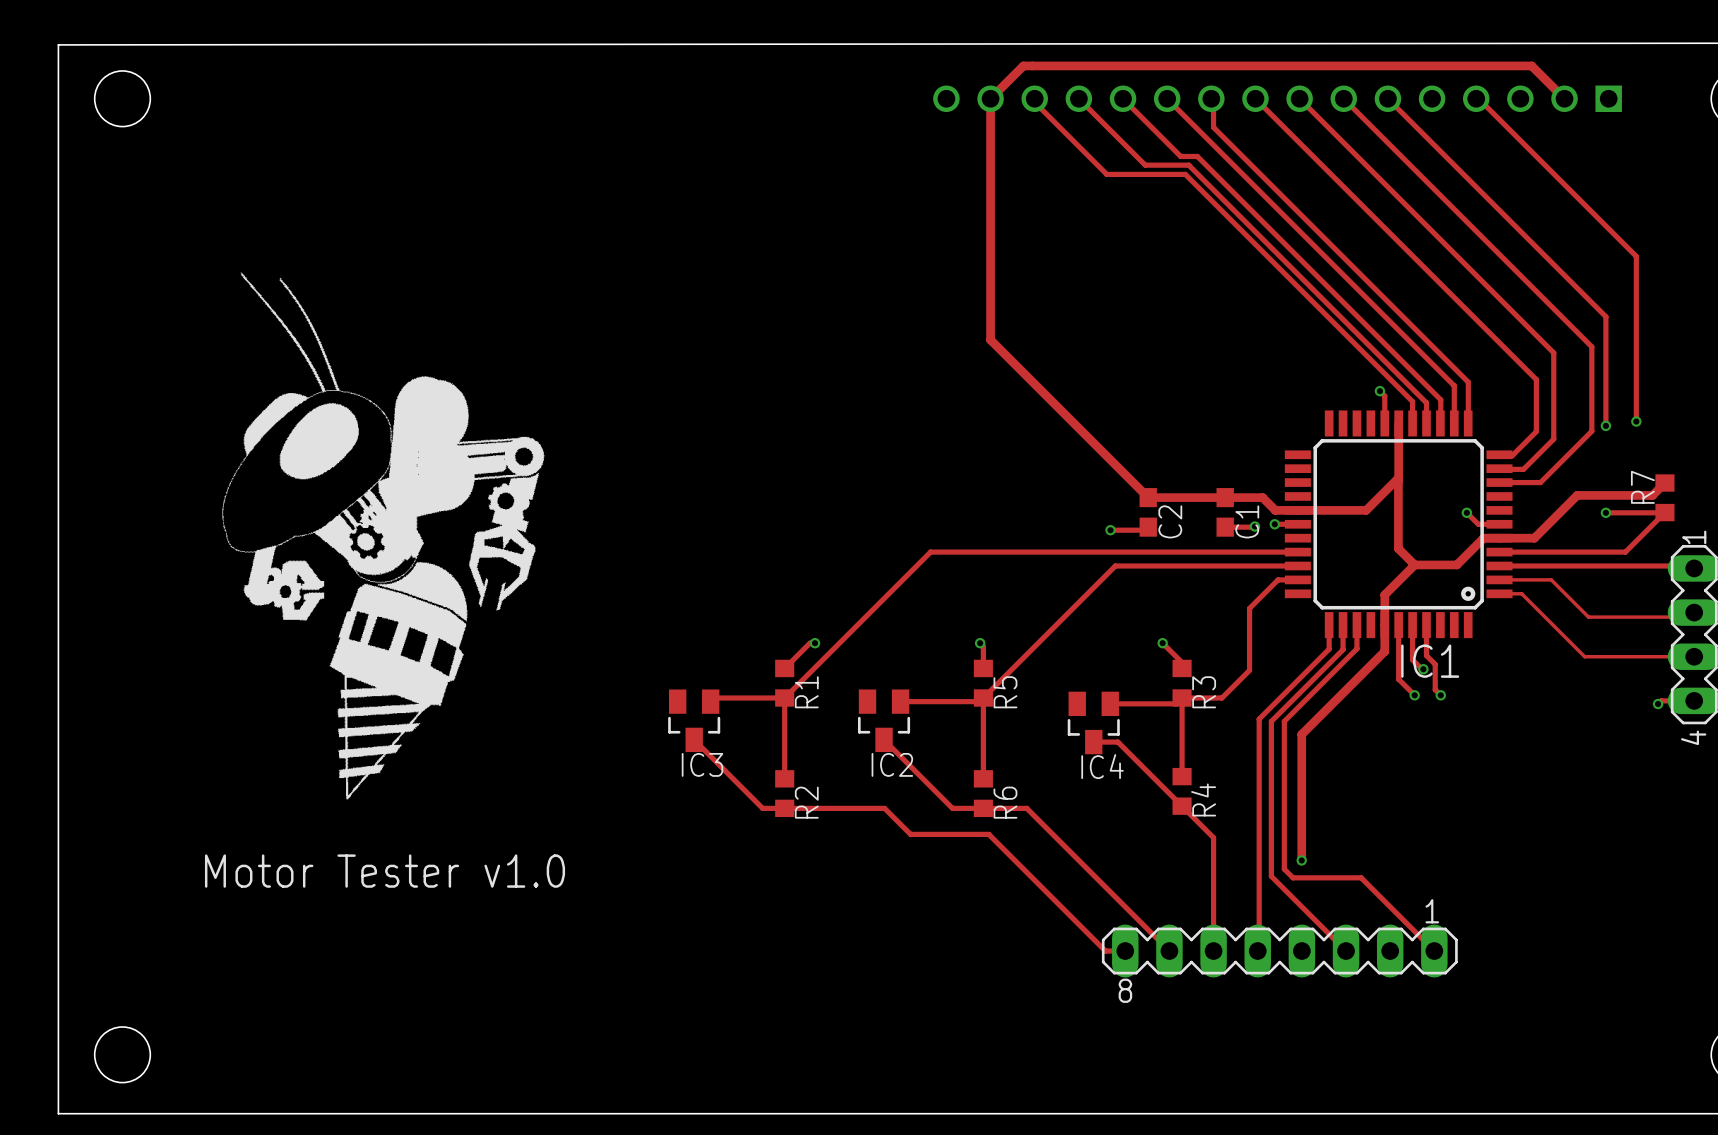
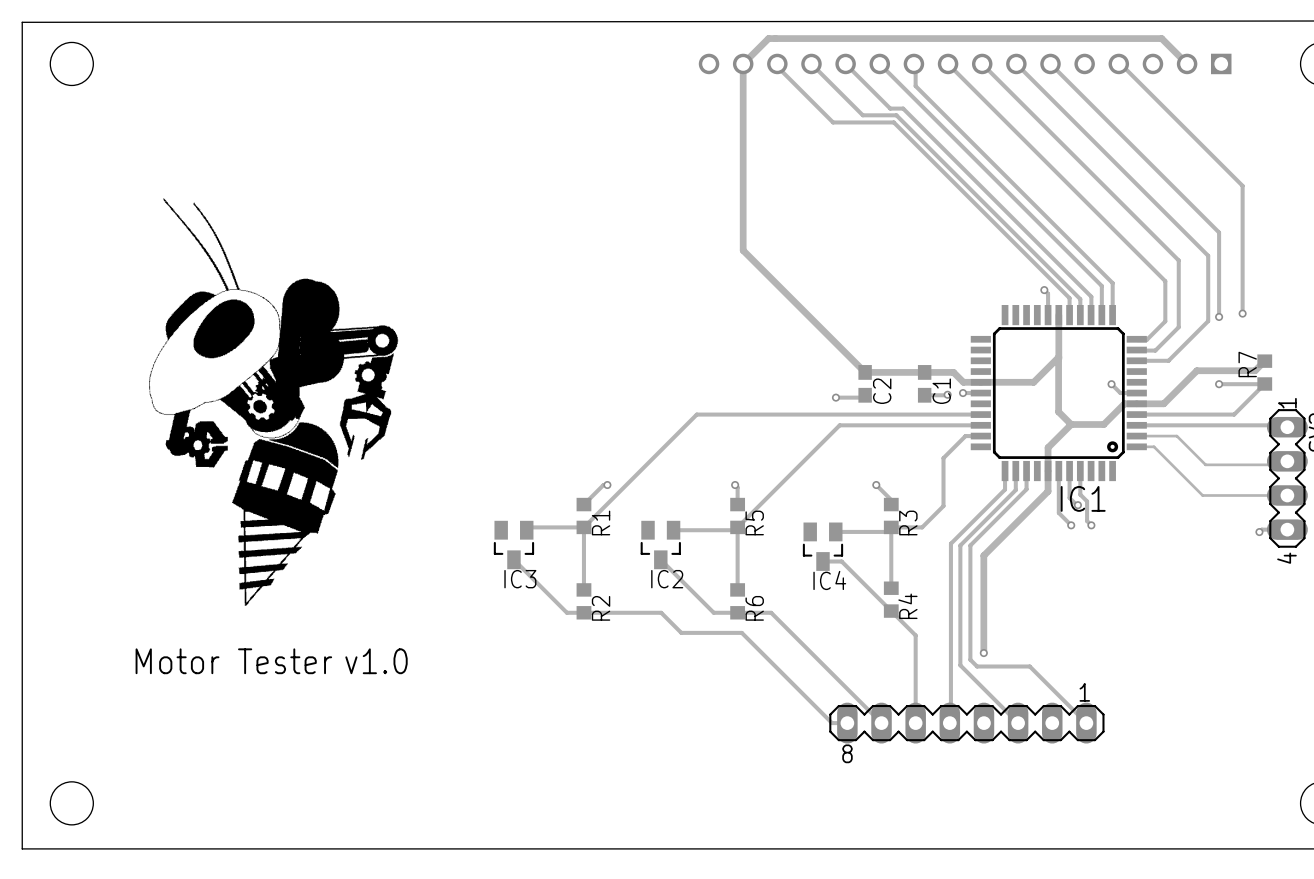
text: Motor Tester v1.0 (385, 871) -> Motor Tester (233, 661)
text: none -> v1.0 (376, 661)

